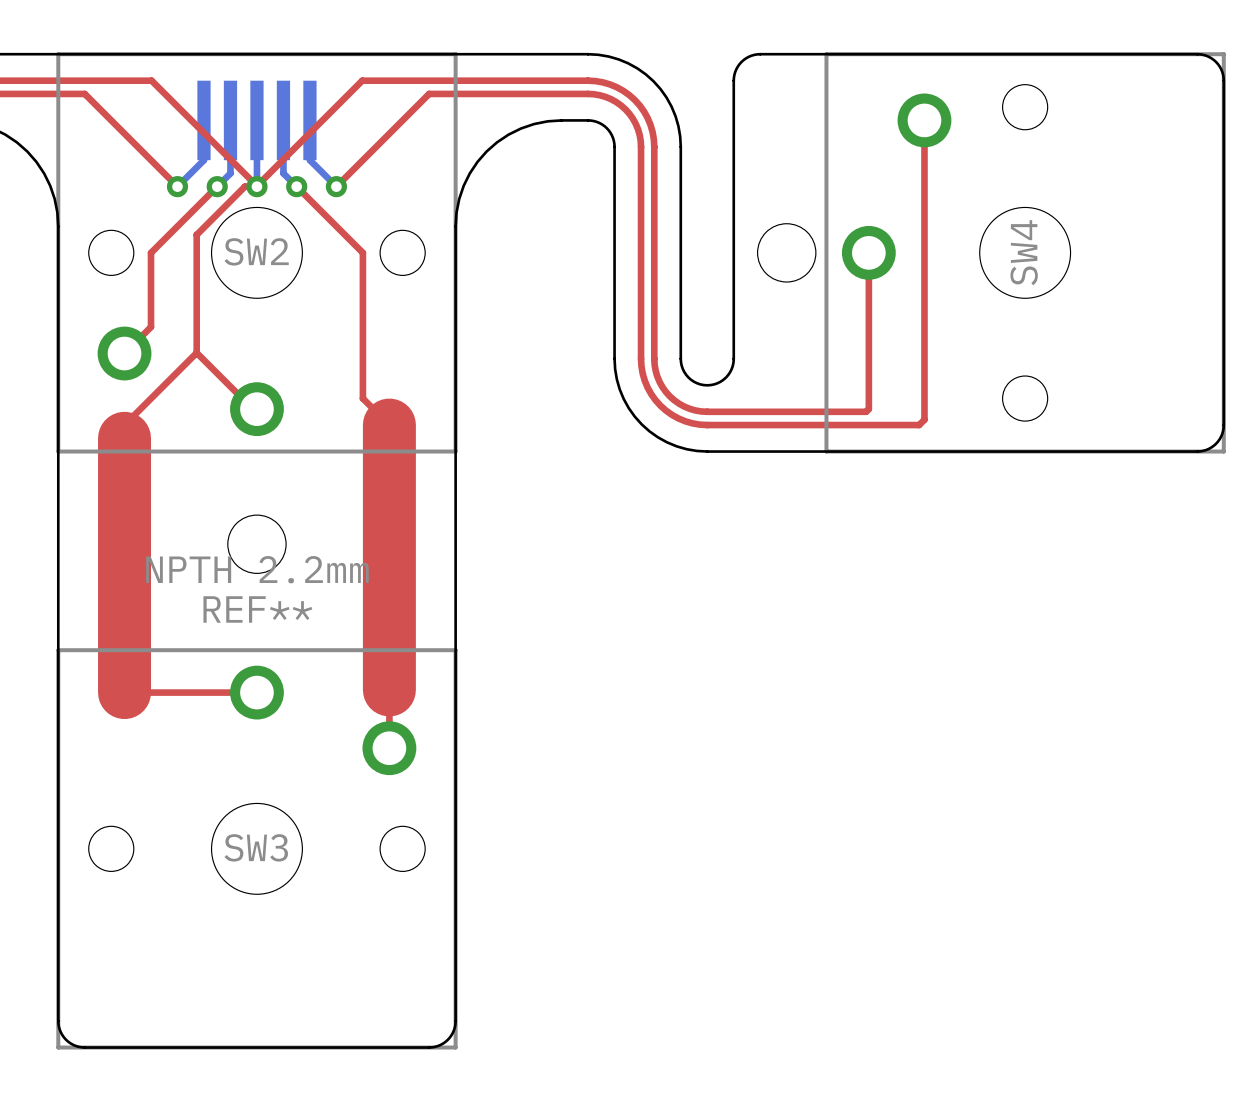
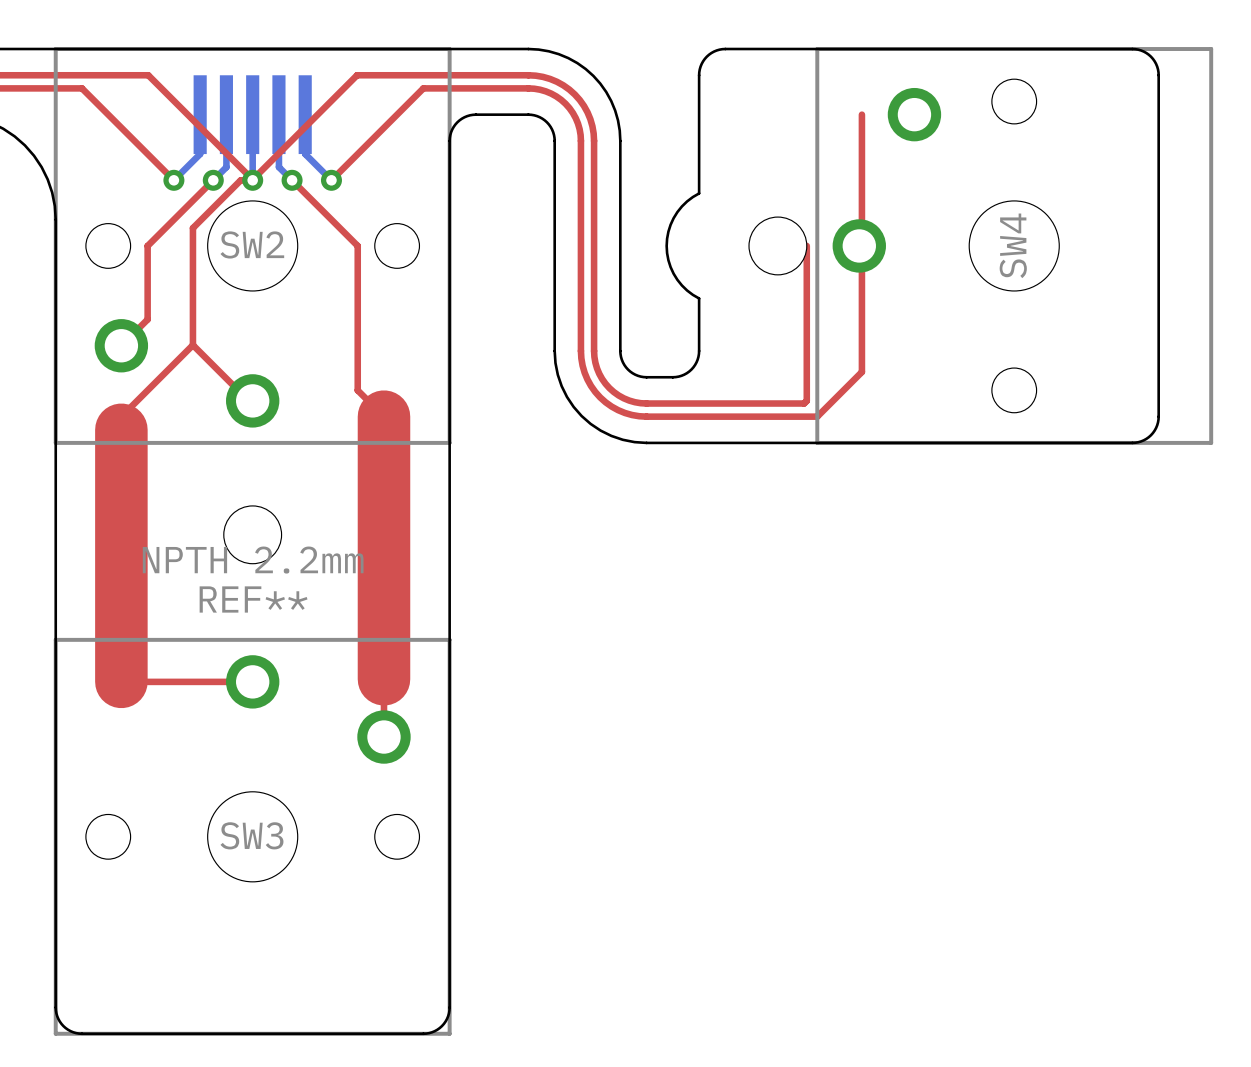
board edge: (535, 54) (598, 54) (618, 59) (637, 68) (653, 81) (671, 106) (678, 126) (680, 146) (681, 362) (688, 377) (697, 383) (707, 385) (717, 383) (726, 377) (733, 362) (733, 77) (741, 61) (748, 56) (760, 54) -> (528, 49) (548, 51) (577, 63) (600, 83) (615, 110) (620, 140) (620, 353) (628, 369) (635, 374) (646, 377) (681, 375) (691, 369) (697, 359) (699, 298) (681, 285) (673, 273) (668, 260) (667, 238) (670, 224) (677, 212) (687, 201) (699, 193) (699, 75) (701, 63) (706, 56) (716, 50) (751, 49)
board edge: (1144, 54) (1206, 55) (1219, 66) (1223, 80) (1223, 430) (1216, 443) (1203, 450) (1144, 451) -> (1132, 49) (1143, 51) (1150, 56) (1157, 66) (1158, 75) (1158, 419) (1150, 435) (1143, 440) (1132, 442)
top track: (535, 80) (588, 80) (609, 84) (629, 95) (639, 105) (647, 118) (652, 132) (654, 146) (655, 370) (662, 387) (674, 400) (689, 408) (707, 411) -> (528, 75) (550, 78) (569, 89) (584, 105) (592, 126) (594, 140) (594, 351) (599, 373) (609, 388) (629, 400) (646, 403) (699, 403)
top track: (535, 93) (588, 93) (605, 96) (621, 105) (635, 123) (641, 146) (641, 358) (642, 373) (651, 394) (665, 410) (685, 421) (707, 425) -> (528, 88) (545, 91) (561, 99) (572, 112) (579, 129) (580, 351) (582, 365) (587, 379) (595, 391) (605, 402) (624, 412) (646, 416) (699, 416)
top track: (924, 120) (924, 419) (919, 425) (826, 425) -> (861, 114) (861, 372) (817, 416)
board edge: (455, 226) (459, 198) (469, 173) (486, 151) (508, 134) (534, 124) (547, 121) (591, 120) (606, 128) (611, 135) (614, 146) (614, 358) (619, 389) (634, 416) (657, 437) (676, 446) (707, 451) -> (449, 219) (449, 137) (457, 122) (472, 114) (528, 114) (537, 116) (546, 122) (552, 129) (554, 140) (554, 351) (557, 374) (561, 386) (573, 406) (581, 415) (590, 423) (611, 435) (634, 442) (699, 442)
top track: (868, 252) (868, 409) (866, 411) (813, 411) -> (806, 245) (806, 400) (804, 403)

